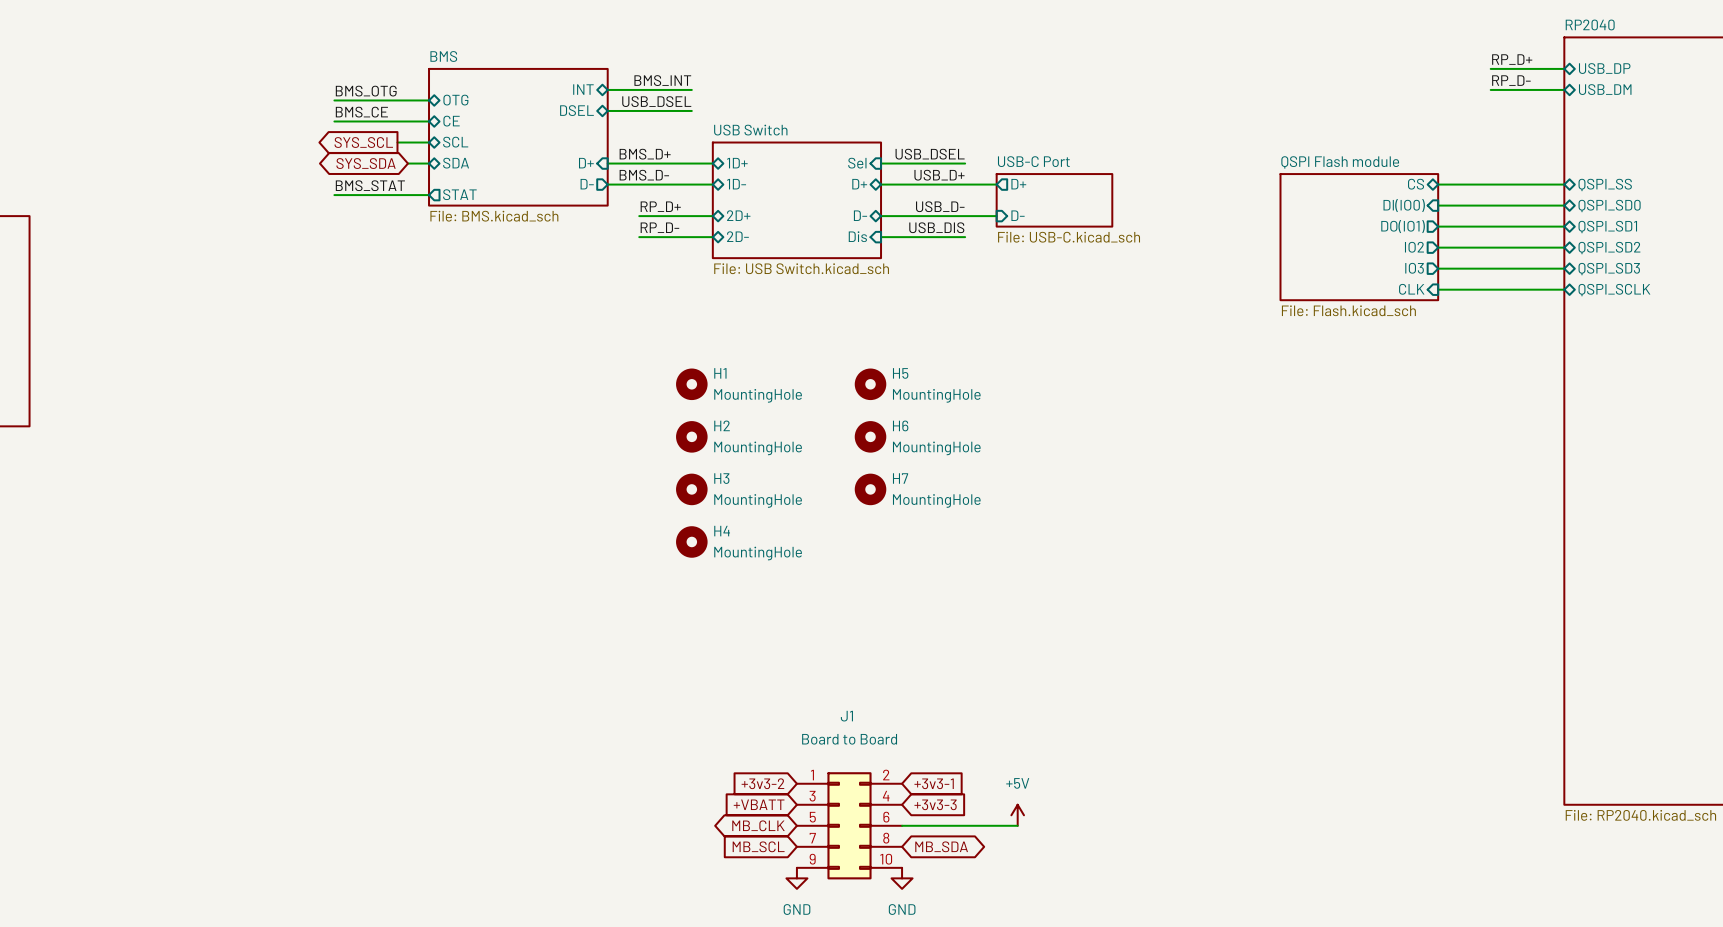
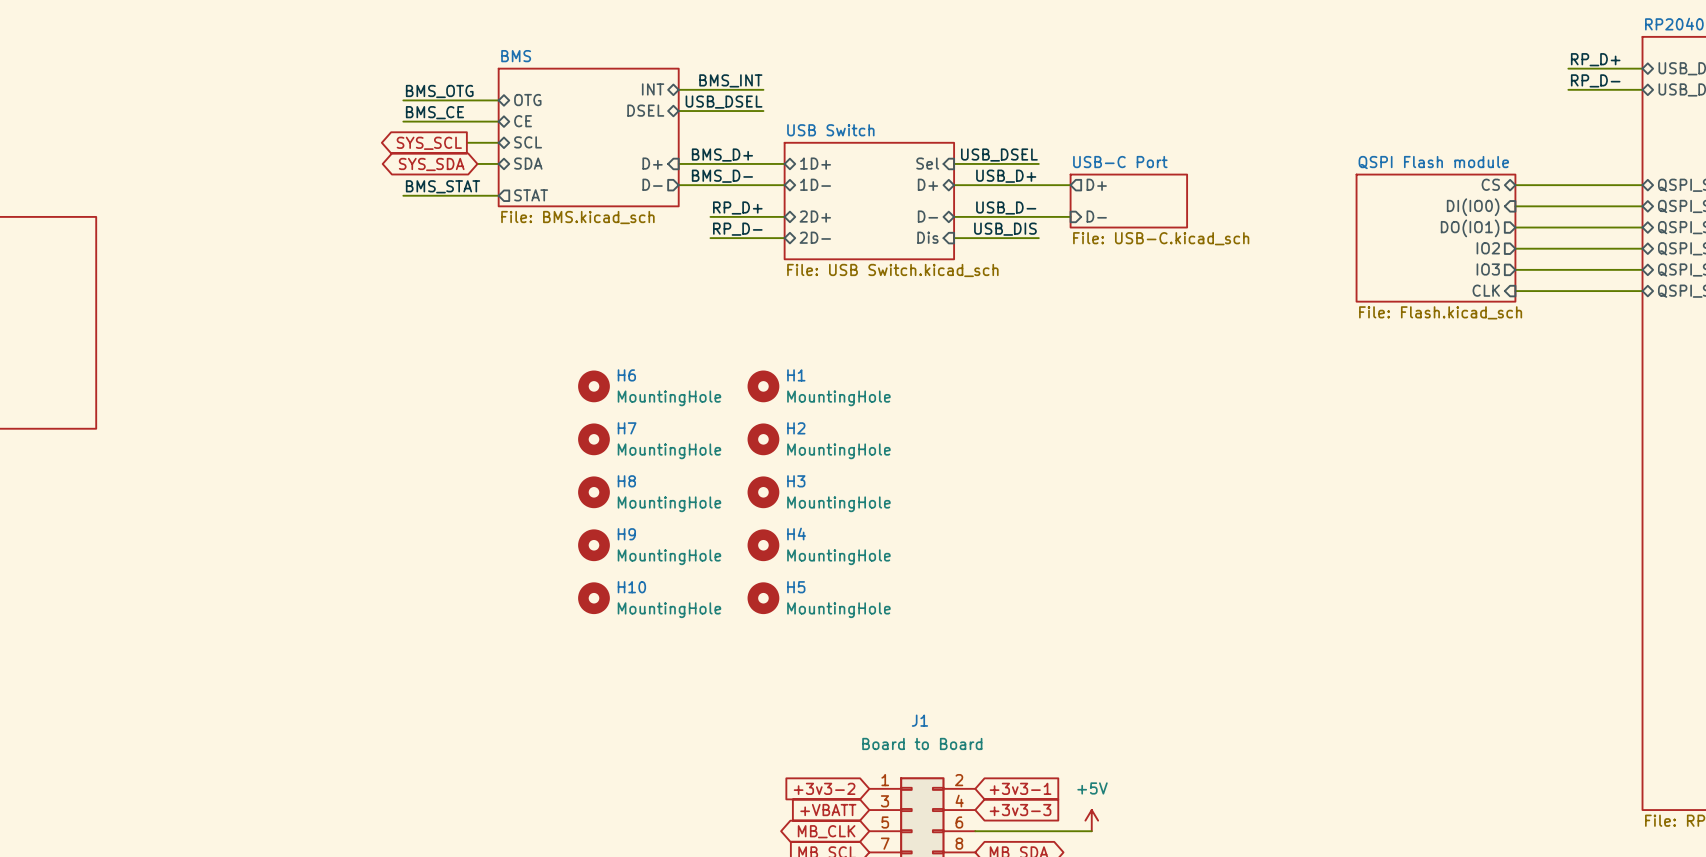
H5 position: (870, 384) -> (763, 598)
H6 position: (870, 436) -> (593, 386)
H8: none -> MountingHole (593, 492)
H7 position: (870, 489) -> (593, 439)
H9: none -> MountingHole (593, 545)
H10: none -> MountingHole (593, 598)

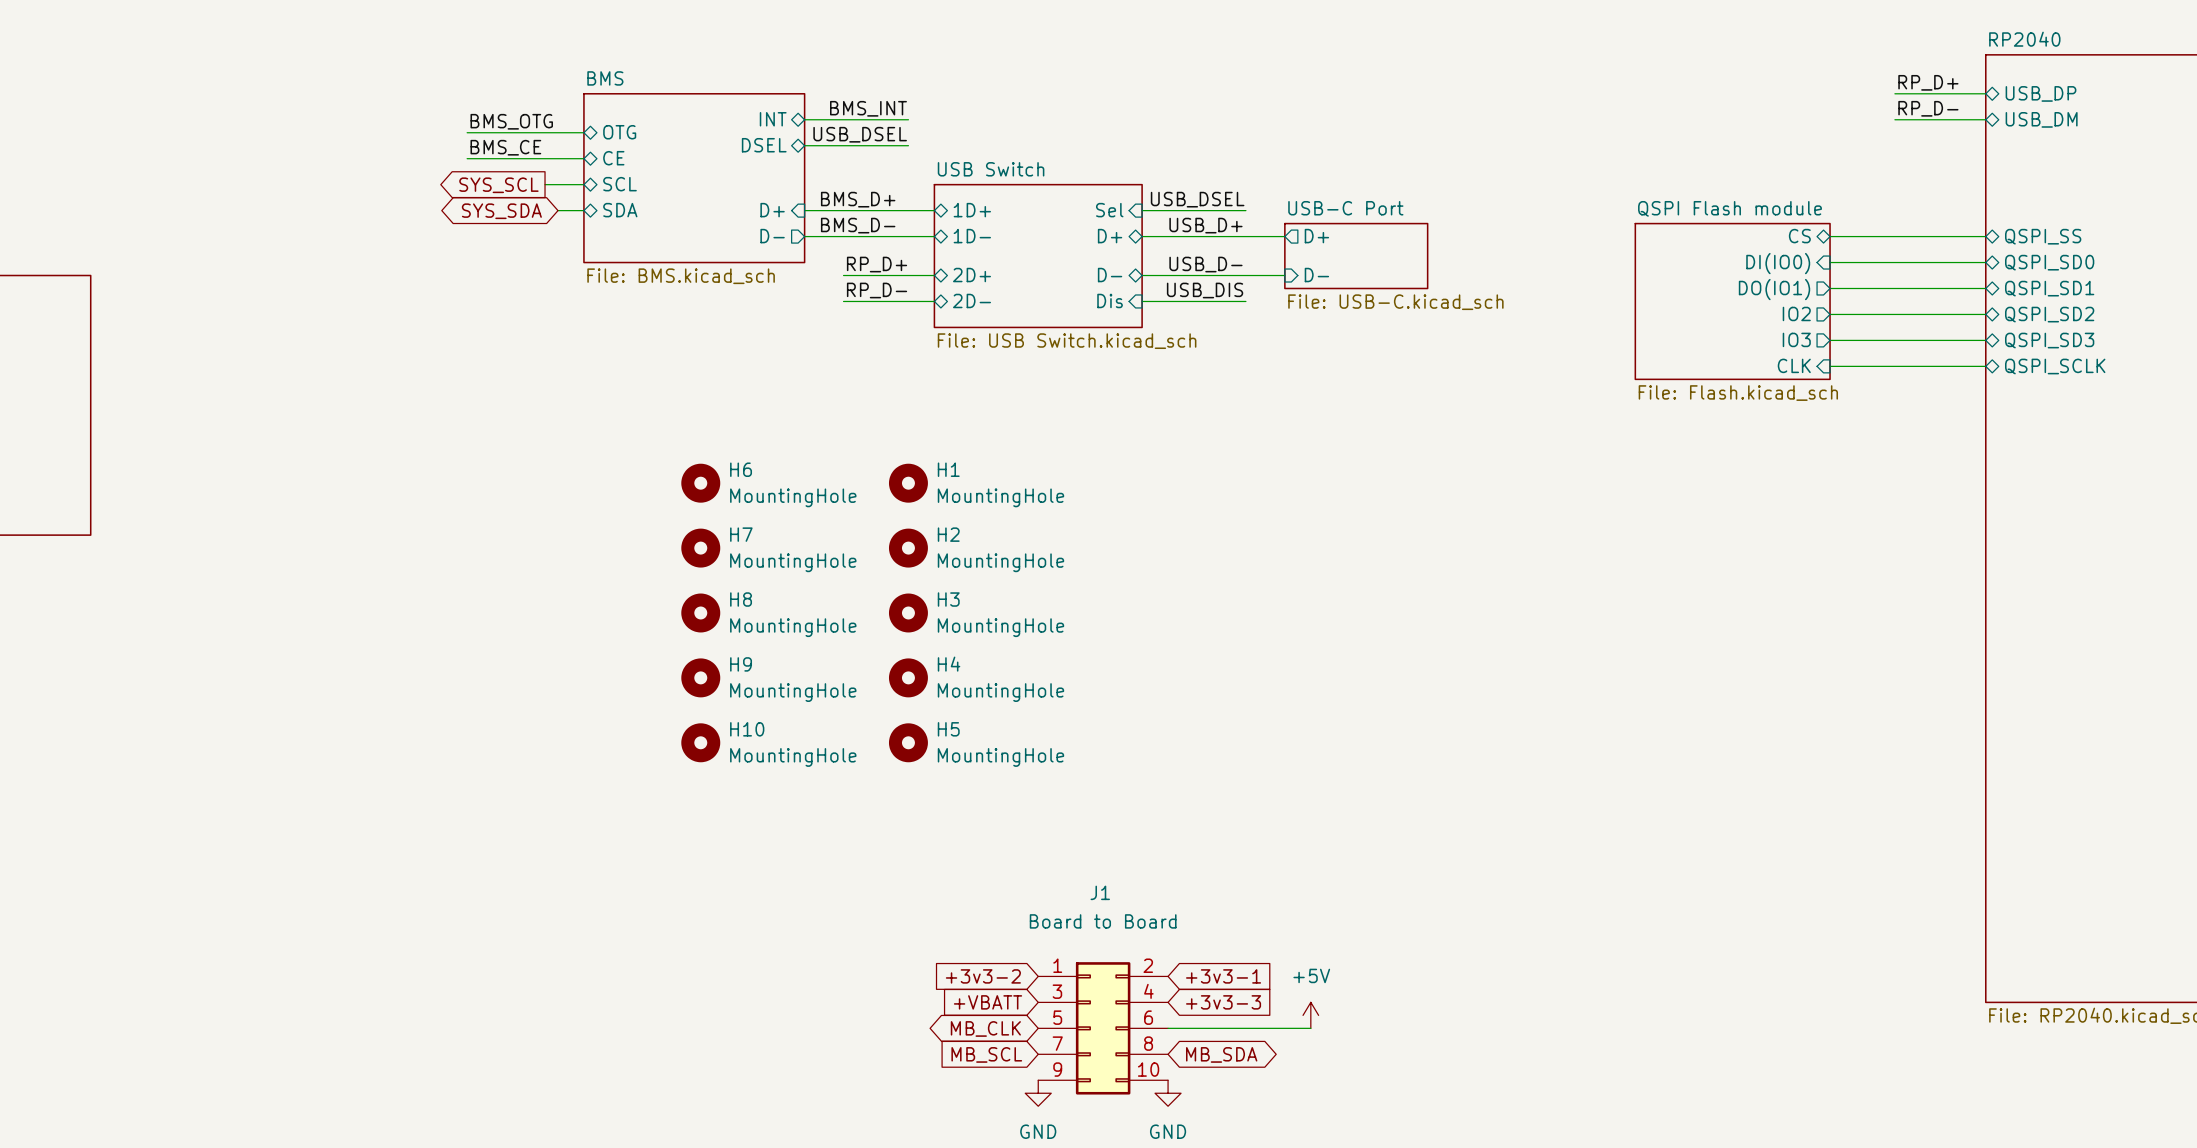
label: BMS_STAT (443, 186) -> none
wire: (403, 195) (498, 195) -> none
sheet pin: STAT (531, 195) -> none

